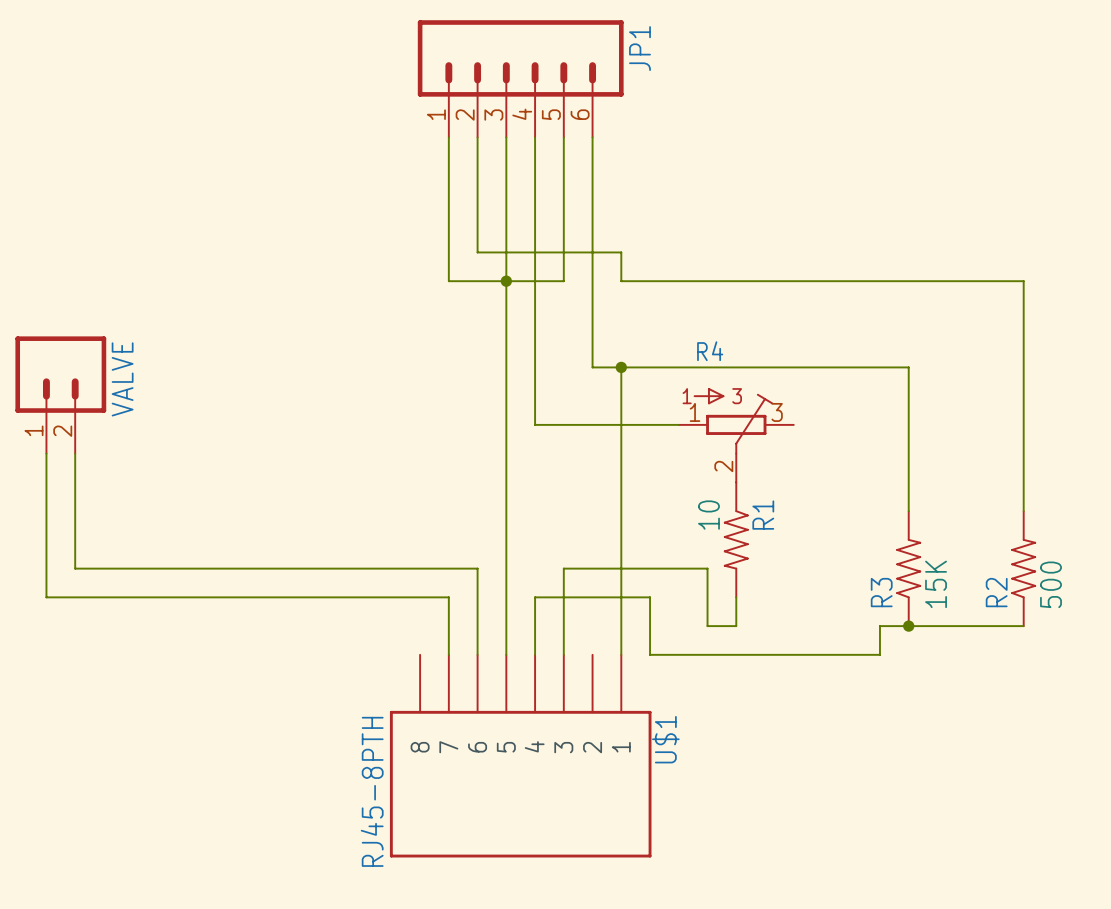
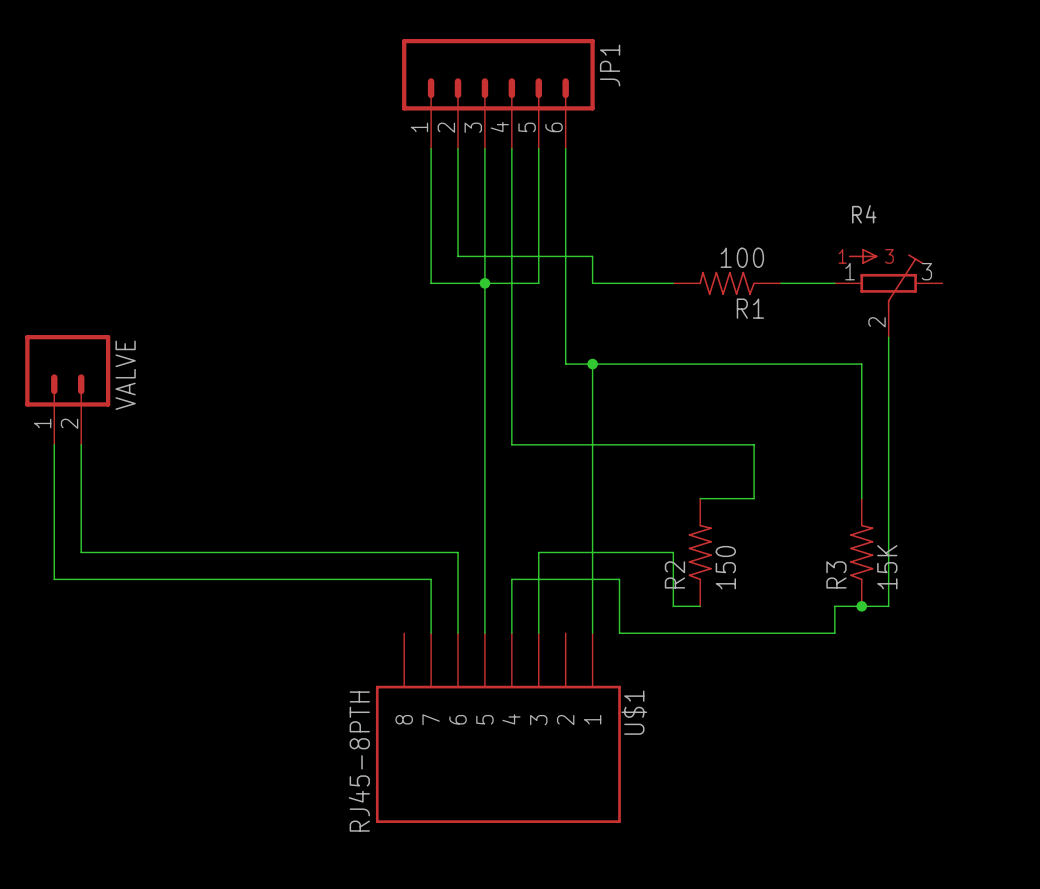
wire: (879, 281) (1023, 281) (1023, 511) -> none
wire: (535, 424) (678, 424) -> (511, 417) (511, 444) (754, 444) (754, 498) (700, 498)
R4 position: (736, 435) -> (888, 293)
R1 value: 10 (708, 515) -> 100 (742, 257)
R1 rotation: 0° (736, 539) -> 90° clockwise (727, 283)
R1 position: (736, 539) -> (727, 283)
R2 position: (1023, 568) -> (700, 552)
R2 value: 500 (1051, 584) -> 150 (725, 567)
wire: (937, 626) (1023, 626) -> (888, 606) (888, 337)

